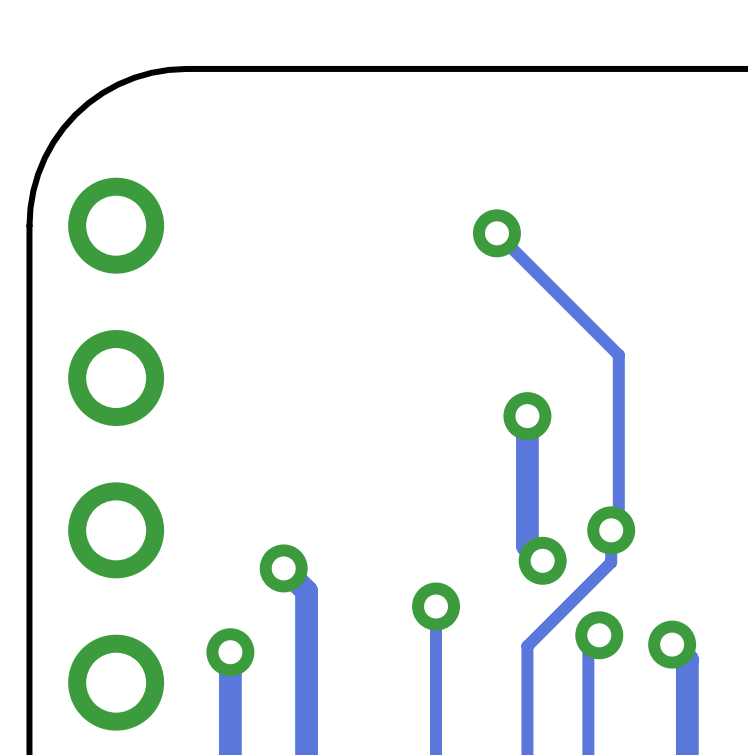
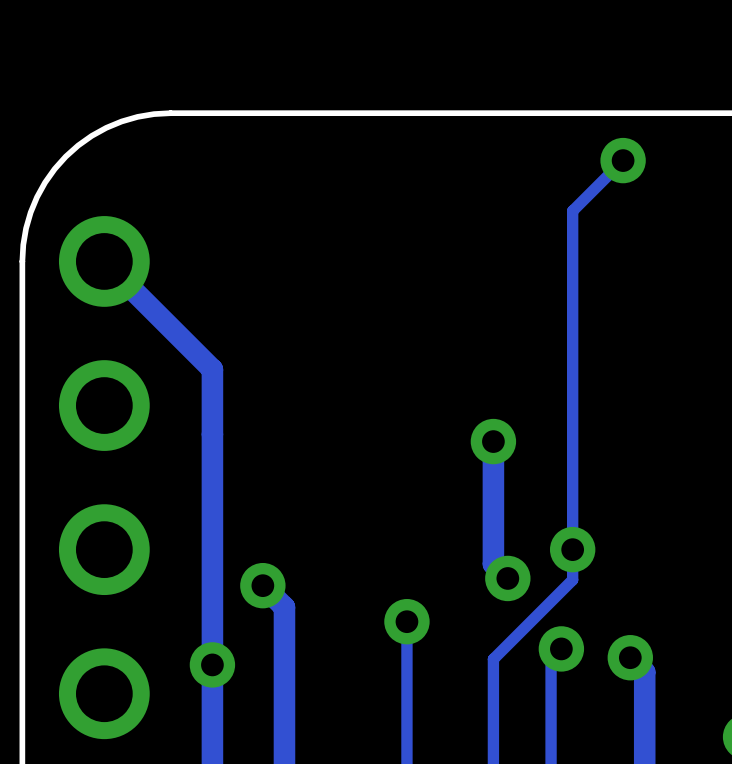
via: none -> (623, 160)
track: none -> (104, 261) (212, 369) (212, 664)
track: (496, 233) (618, 355) (618, 522) (611, 530) -> (623, 160) (572, 211) (572, 549)
via: (496, 233) -> none

